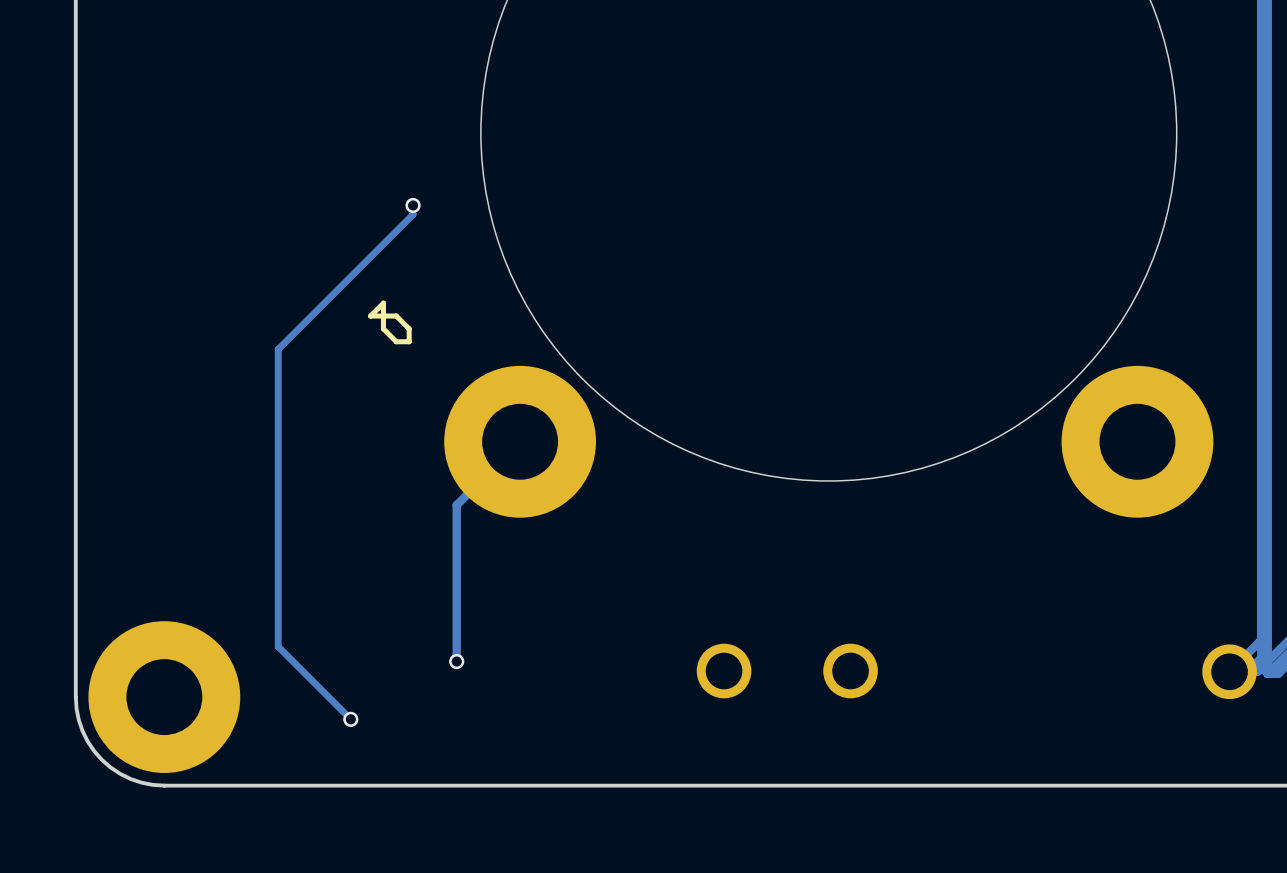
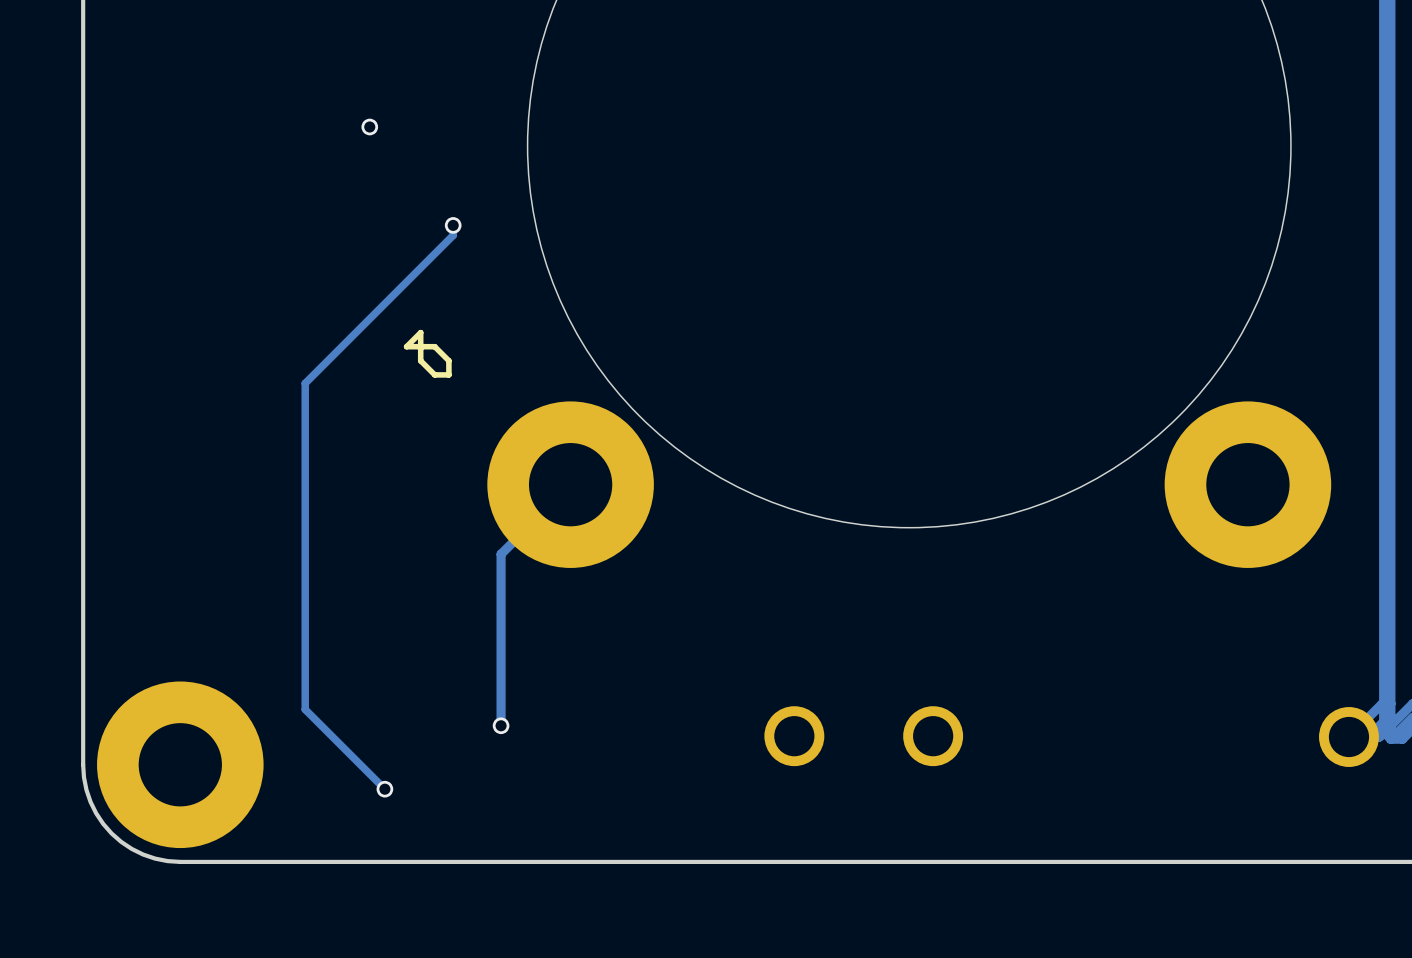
via: none -> (369, 127)

